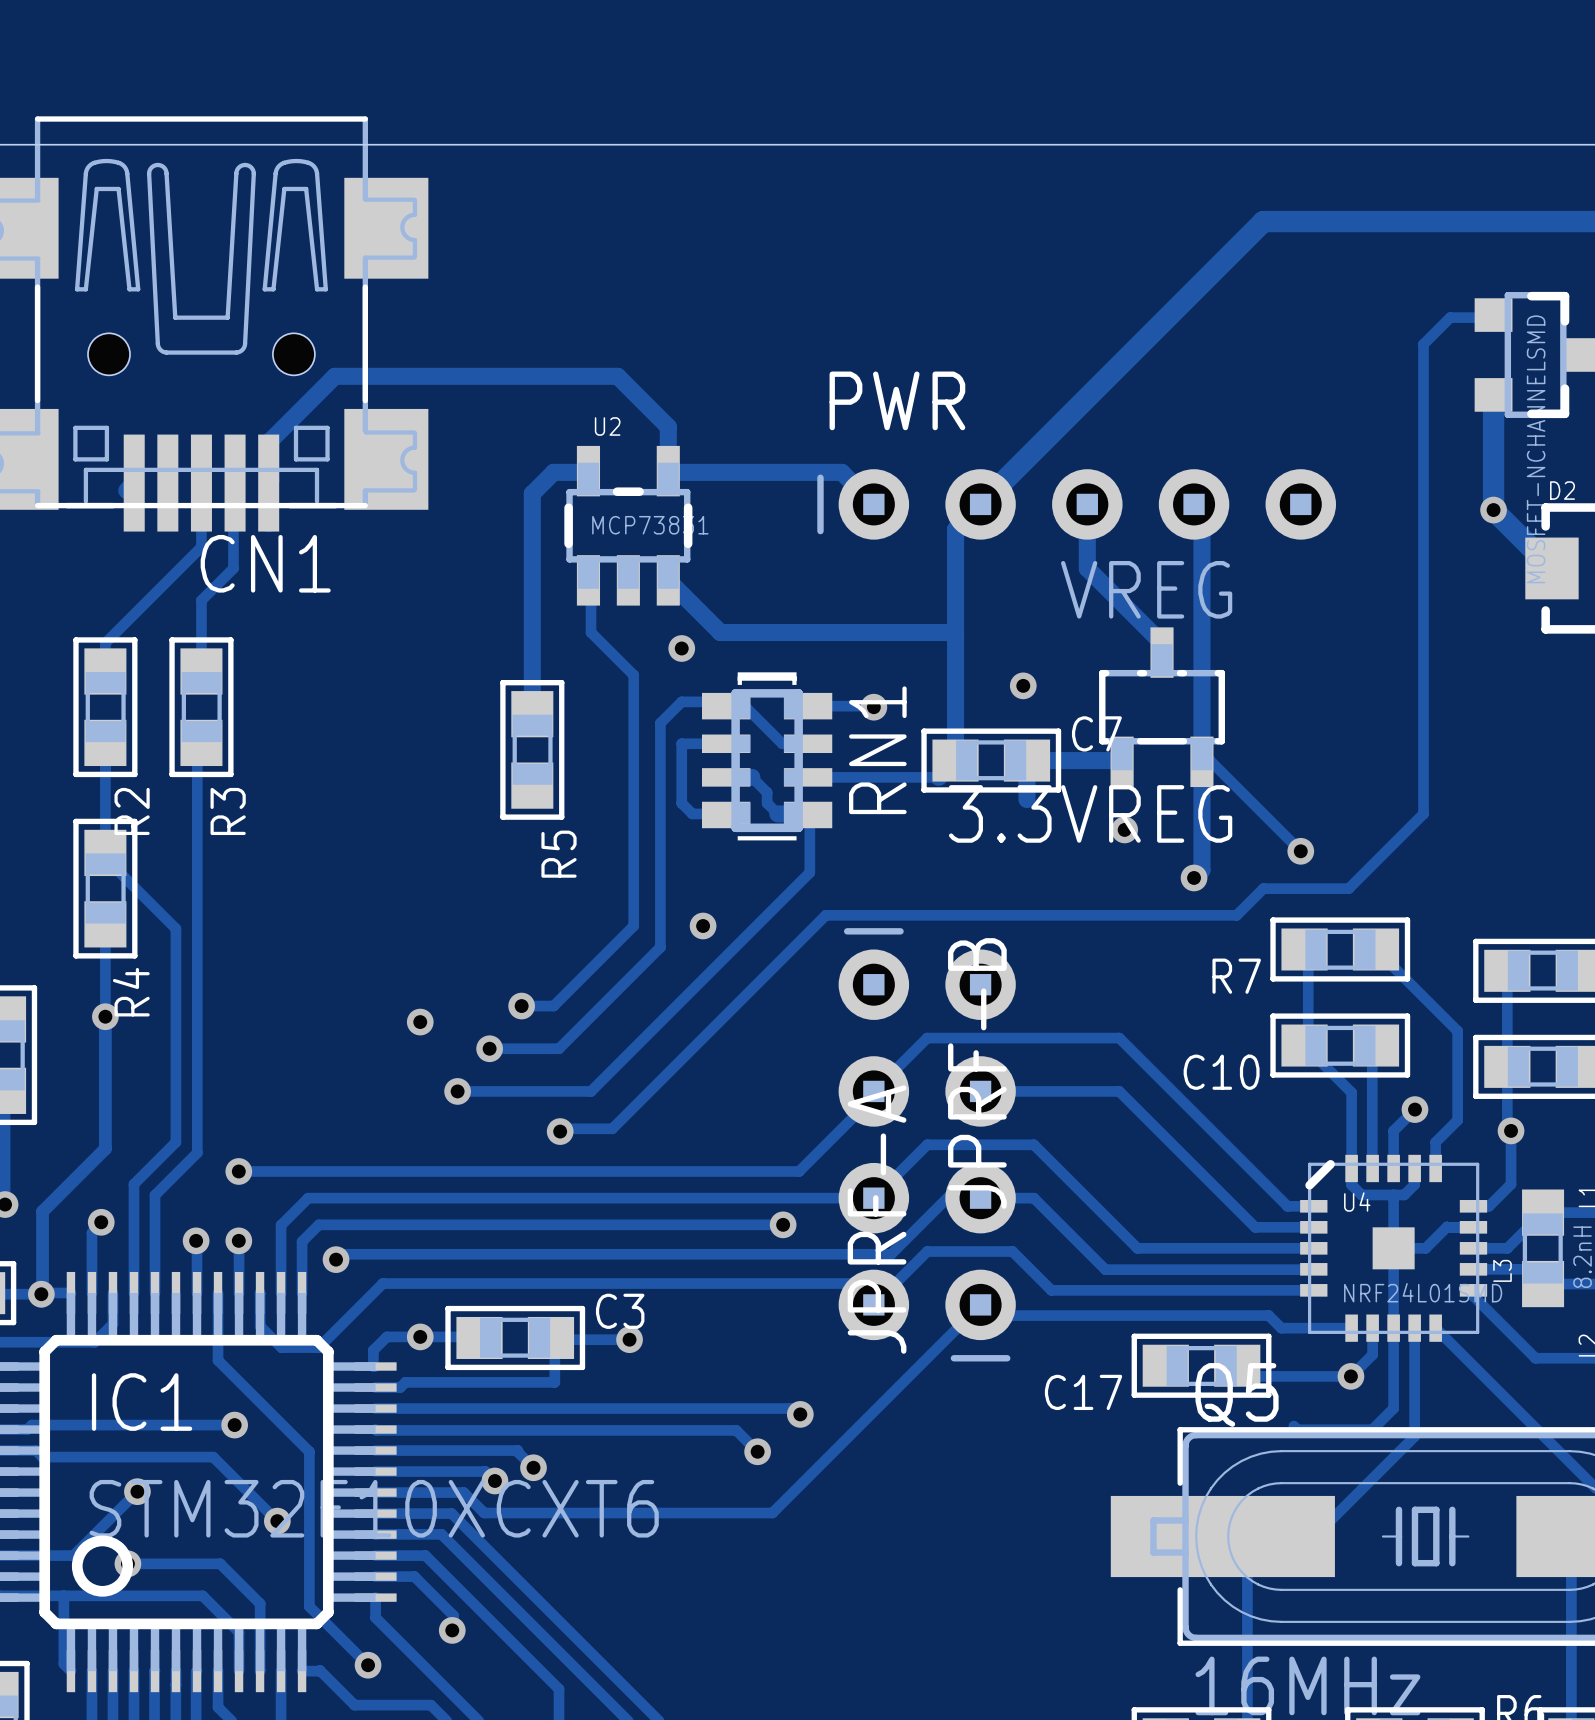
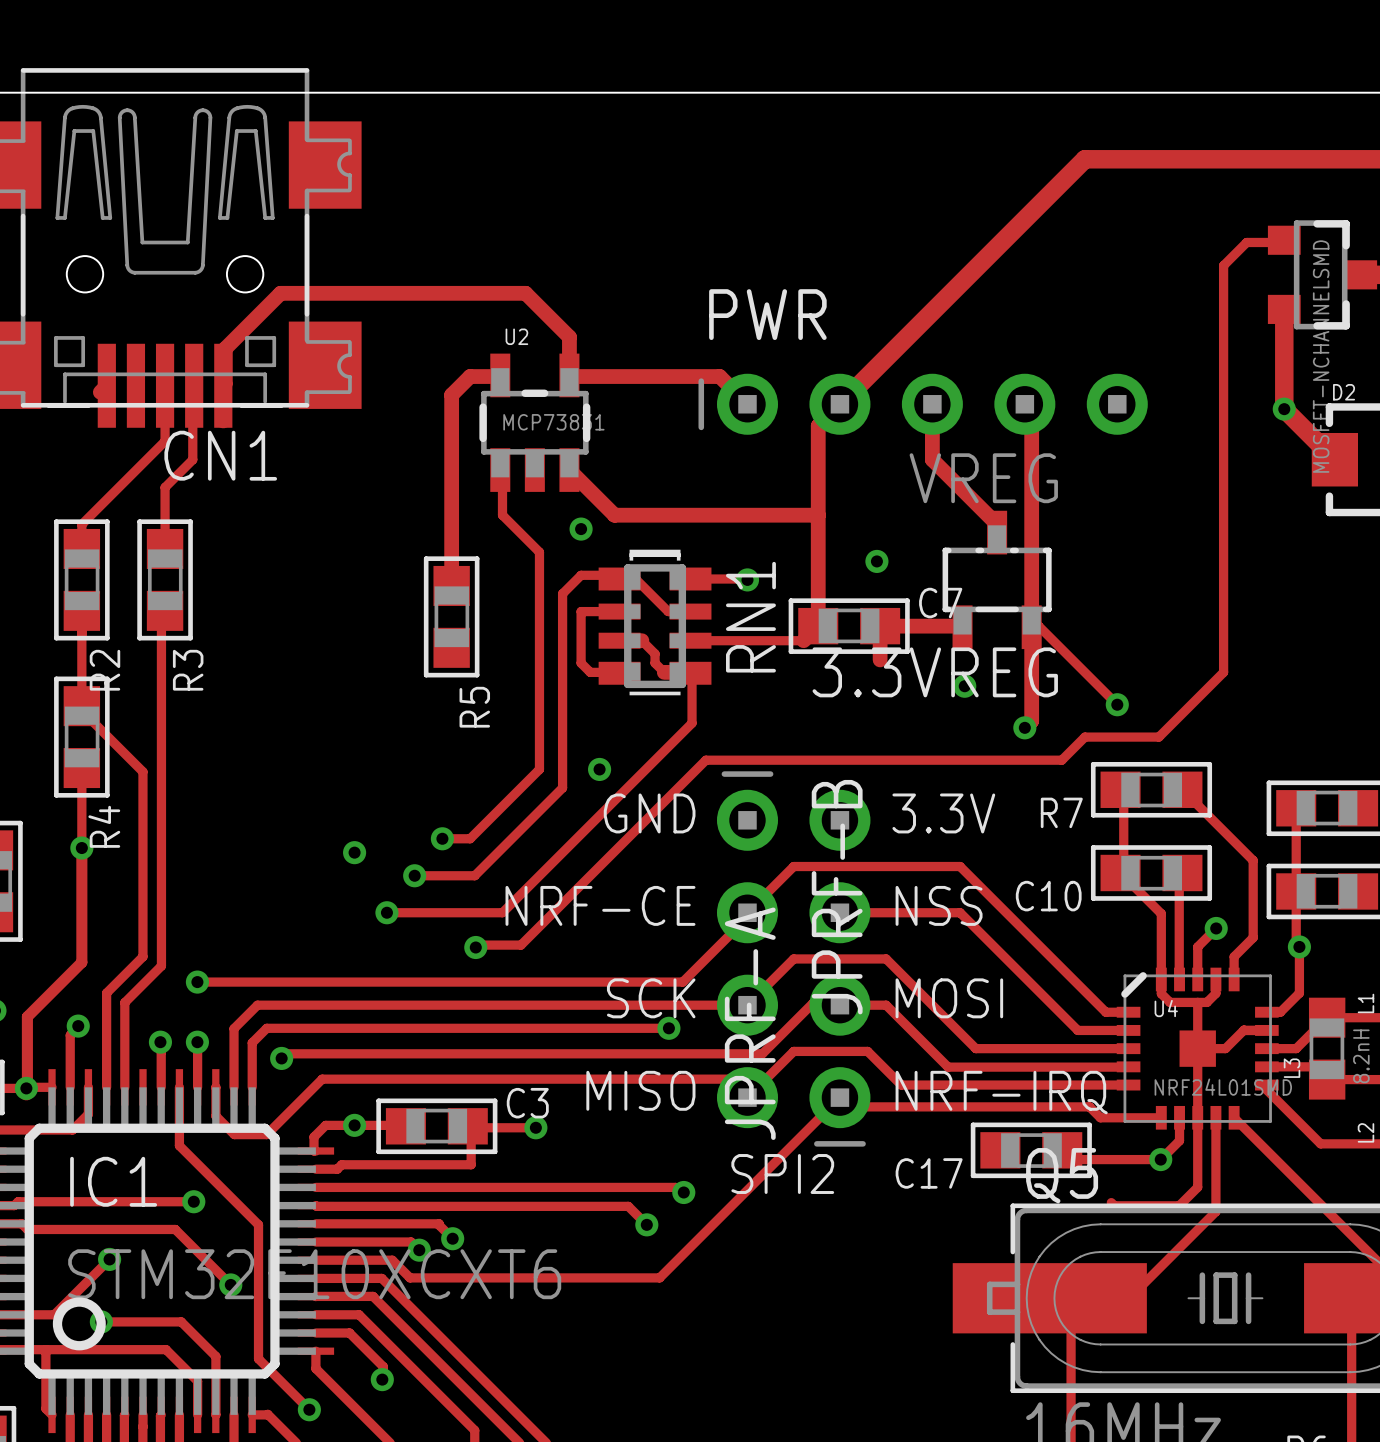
text: none -> GND (649, 813)
text: none -> 3.3V (943, 813)
text: none -> NRF-CE (600, 905)
text: none -> NSS (939, 905)
text: none -> SCK (651, 998)
text: none -> MOSI (949, 998)
text: none -> MISO (640, 1090)
text: none -> NRF-IRQ (1001, 1092)
text: none -> SPI2 (782, 1174)

